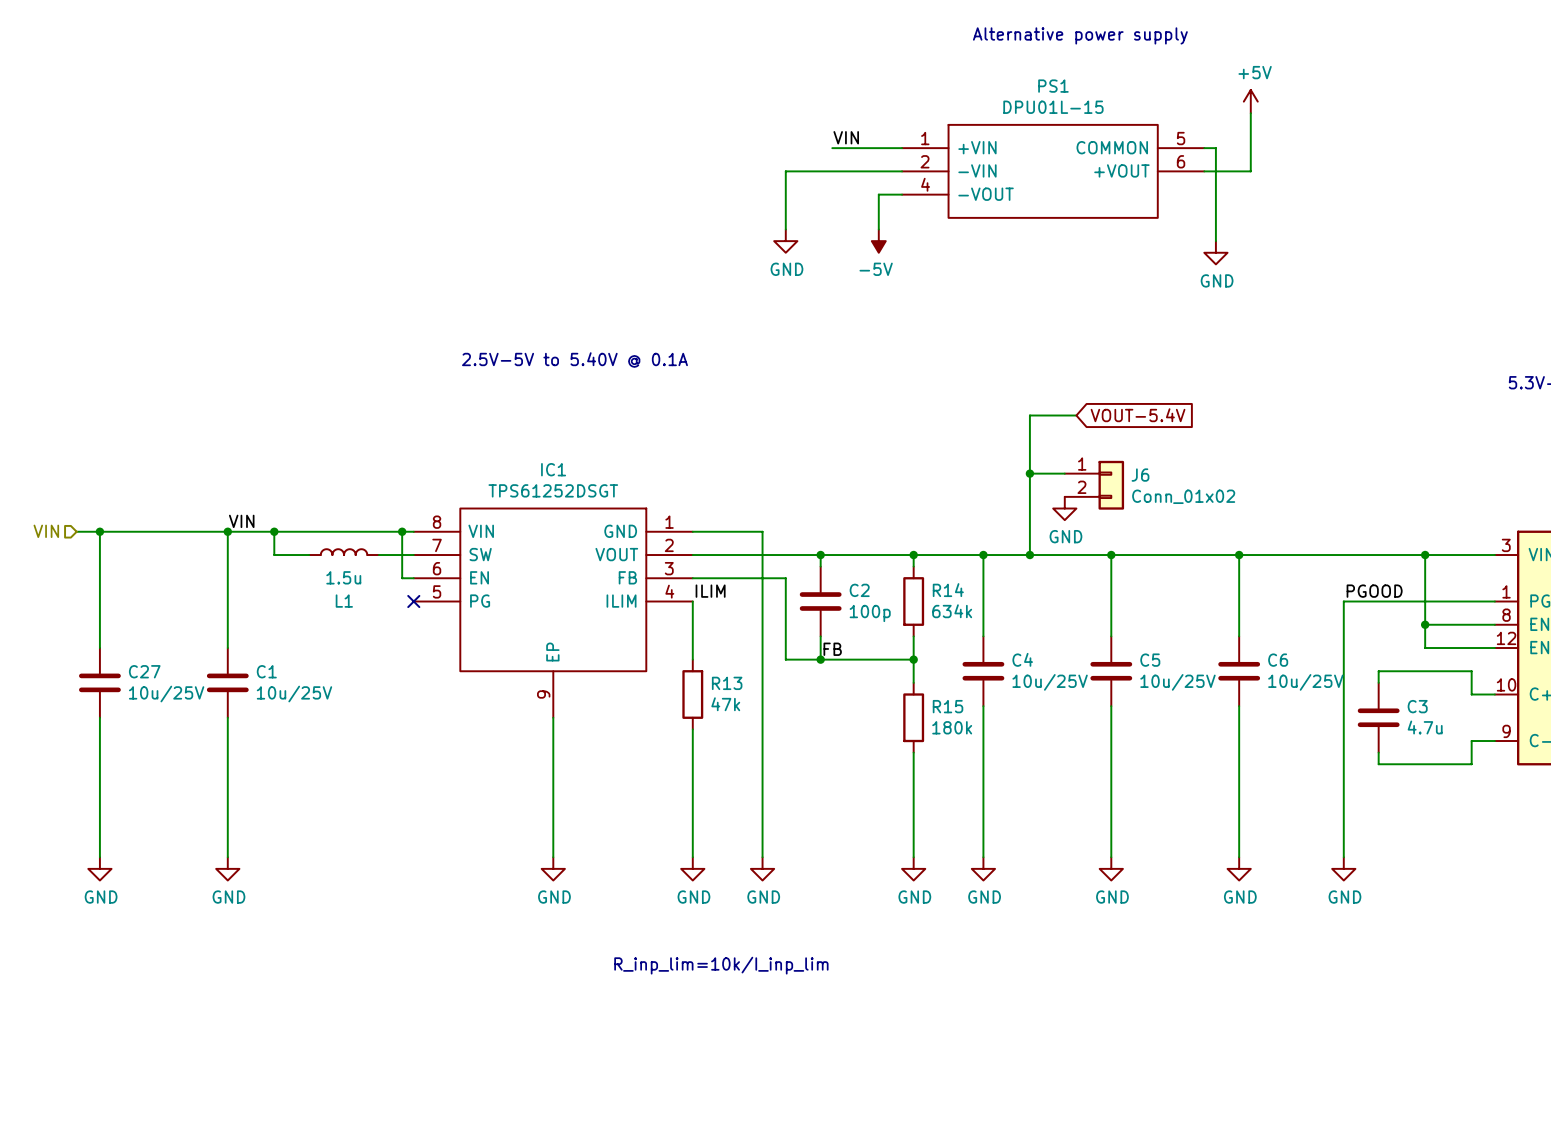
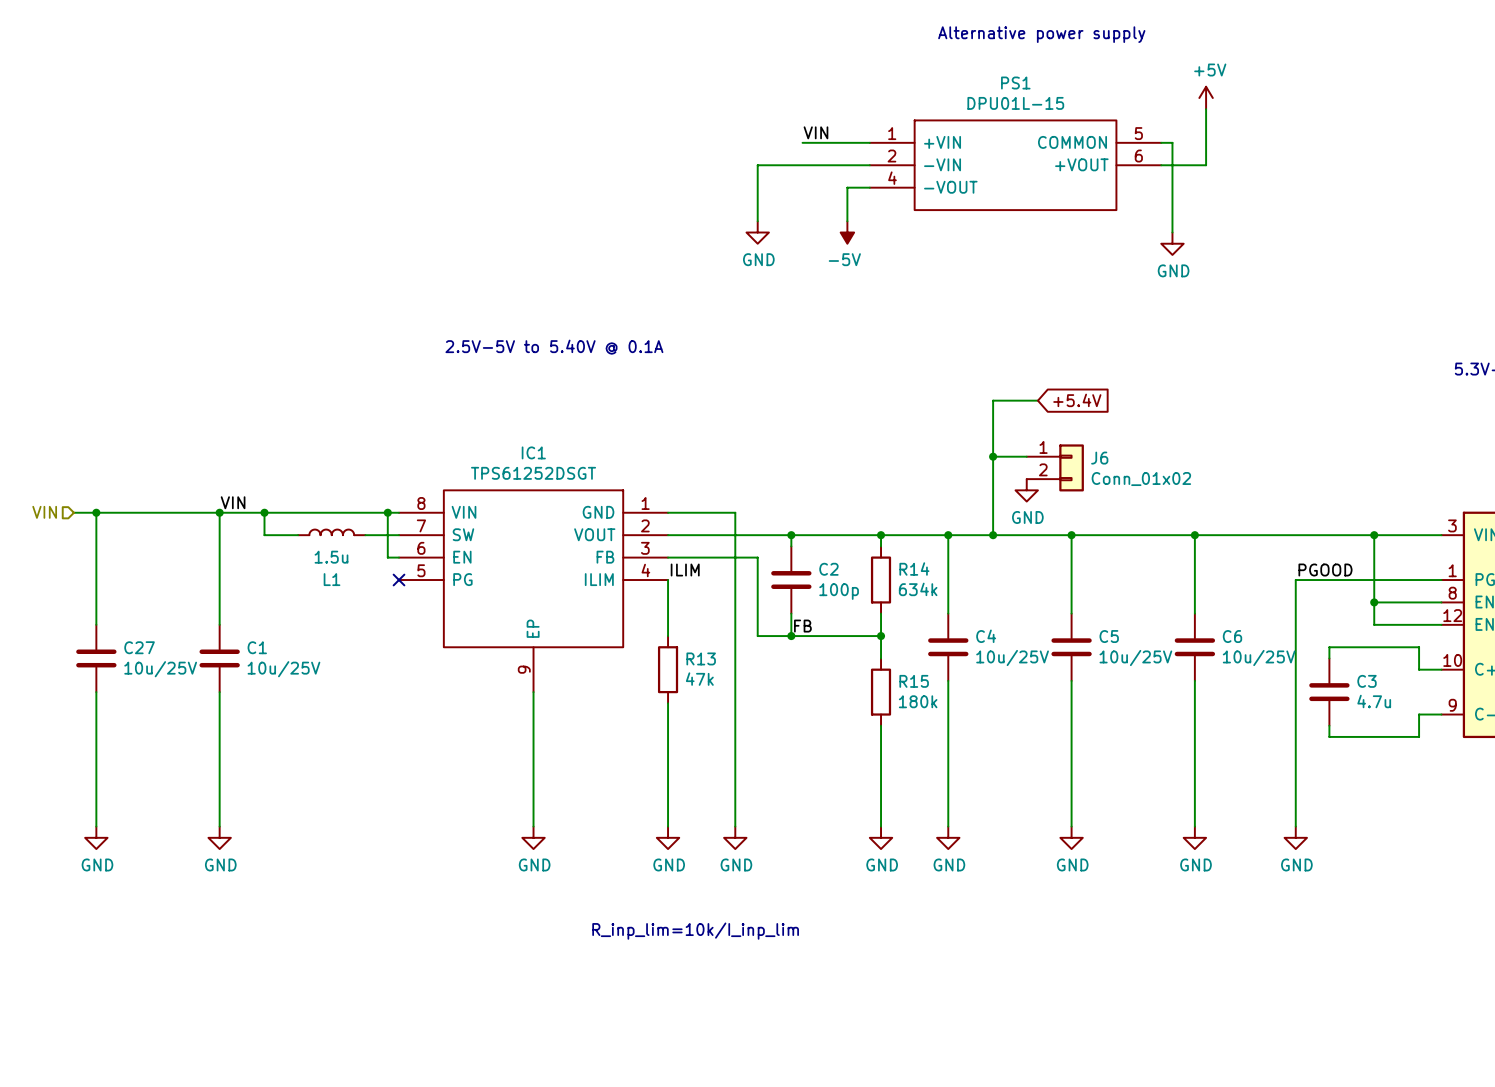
global label: VOUT-5.4V (1138, 415) -> +5.4V (1077, 400)

